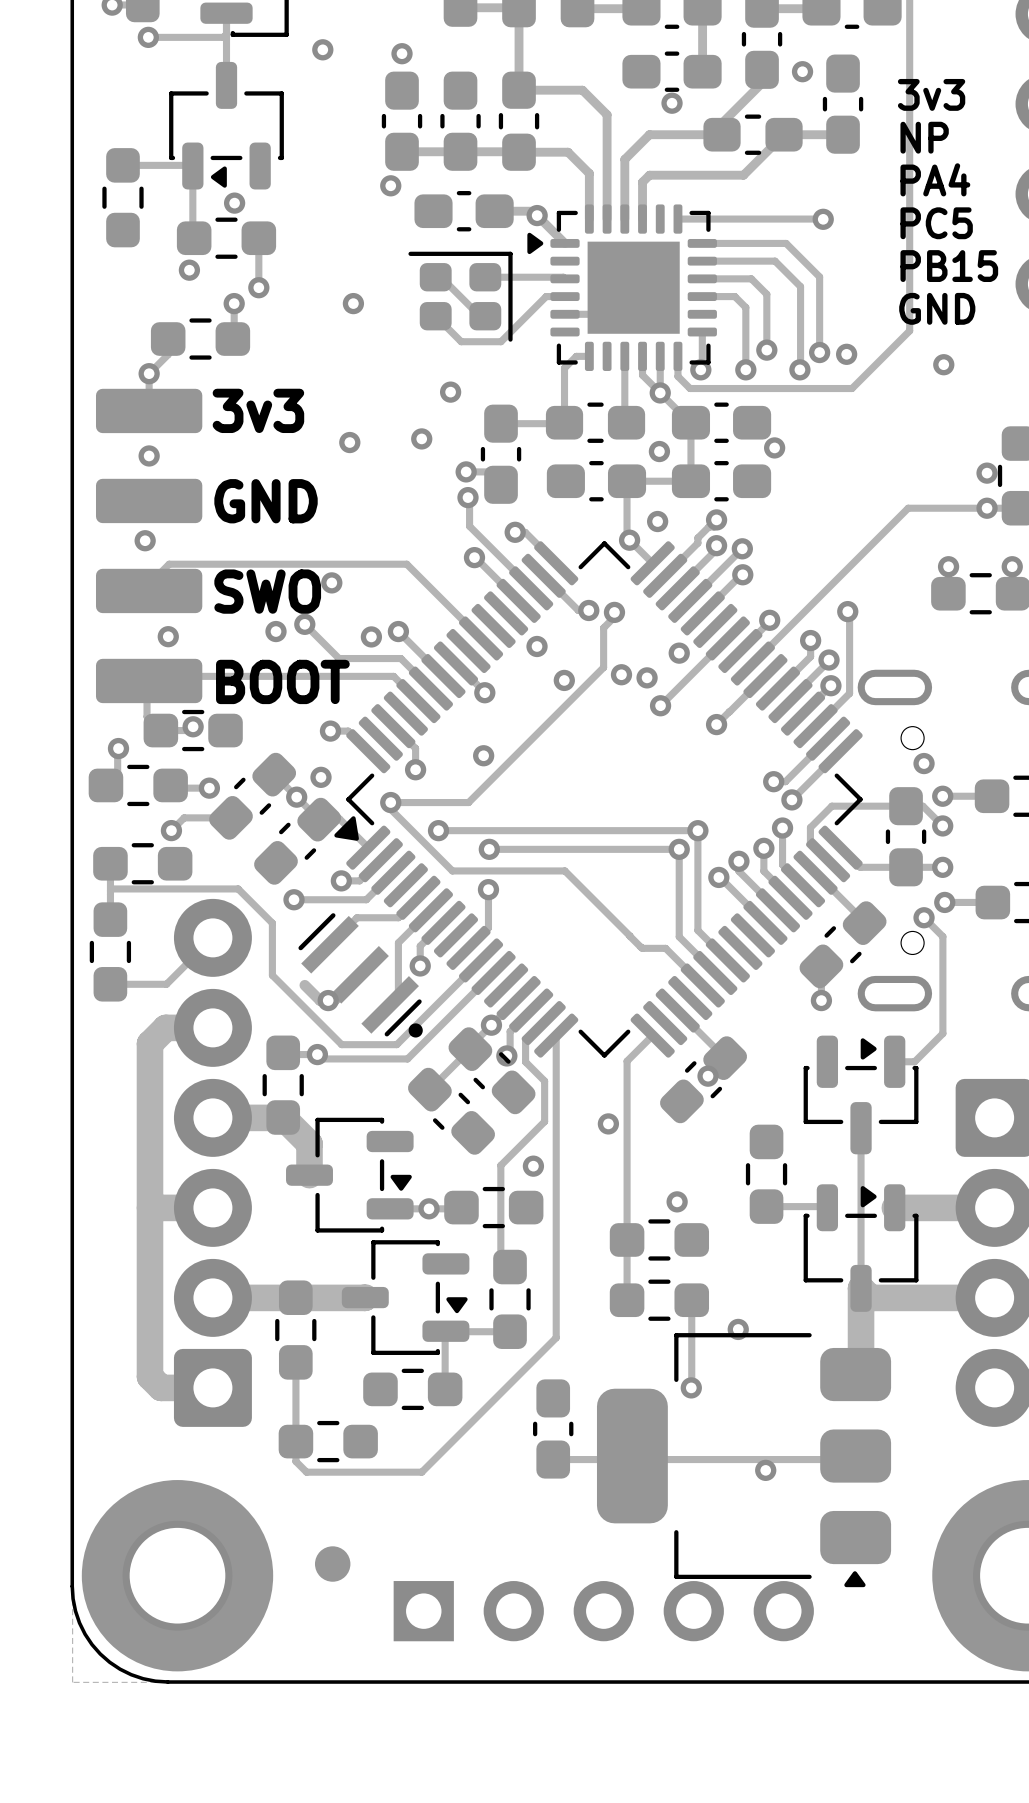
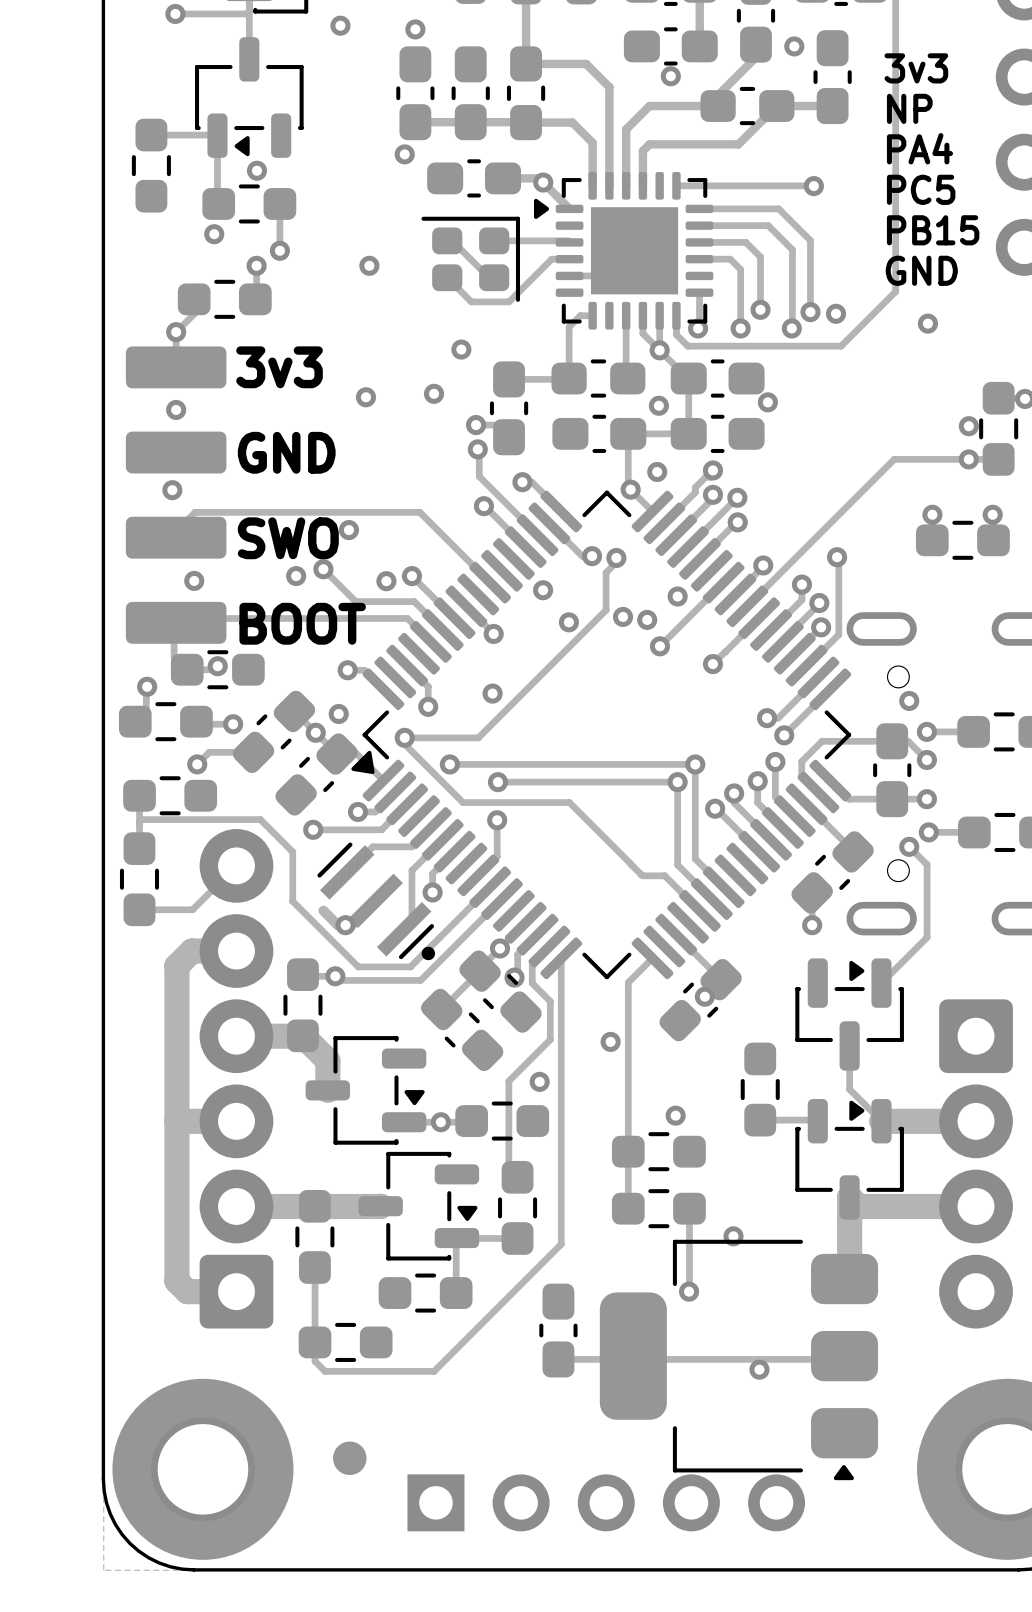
track: (942, 1013) (942, 1033) (914, 1061) (894, 1061) -> (927, 937) (881, 983)
track: (861, 1174) (861, 1288) -> (849, 1089) (881, 1121)

